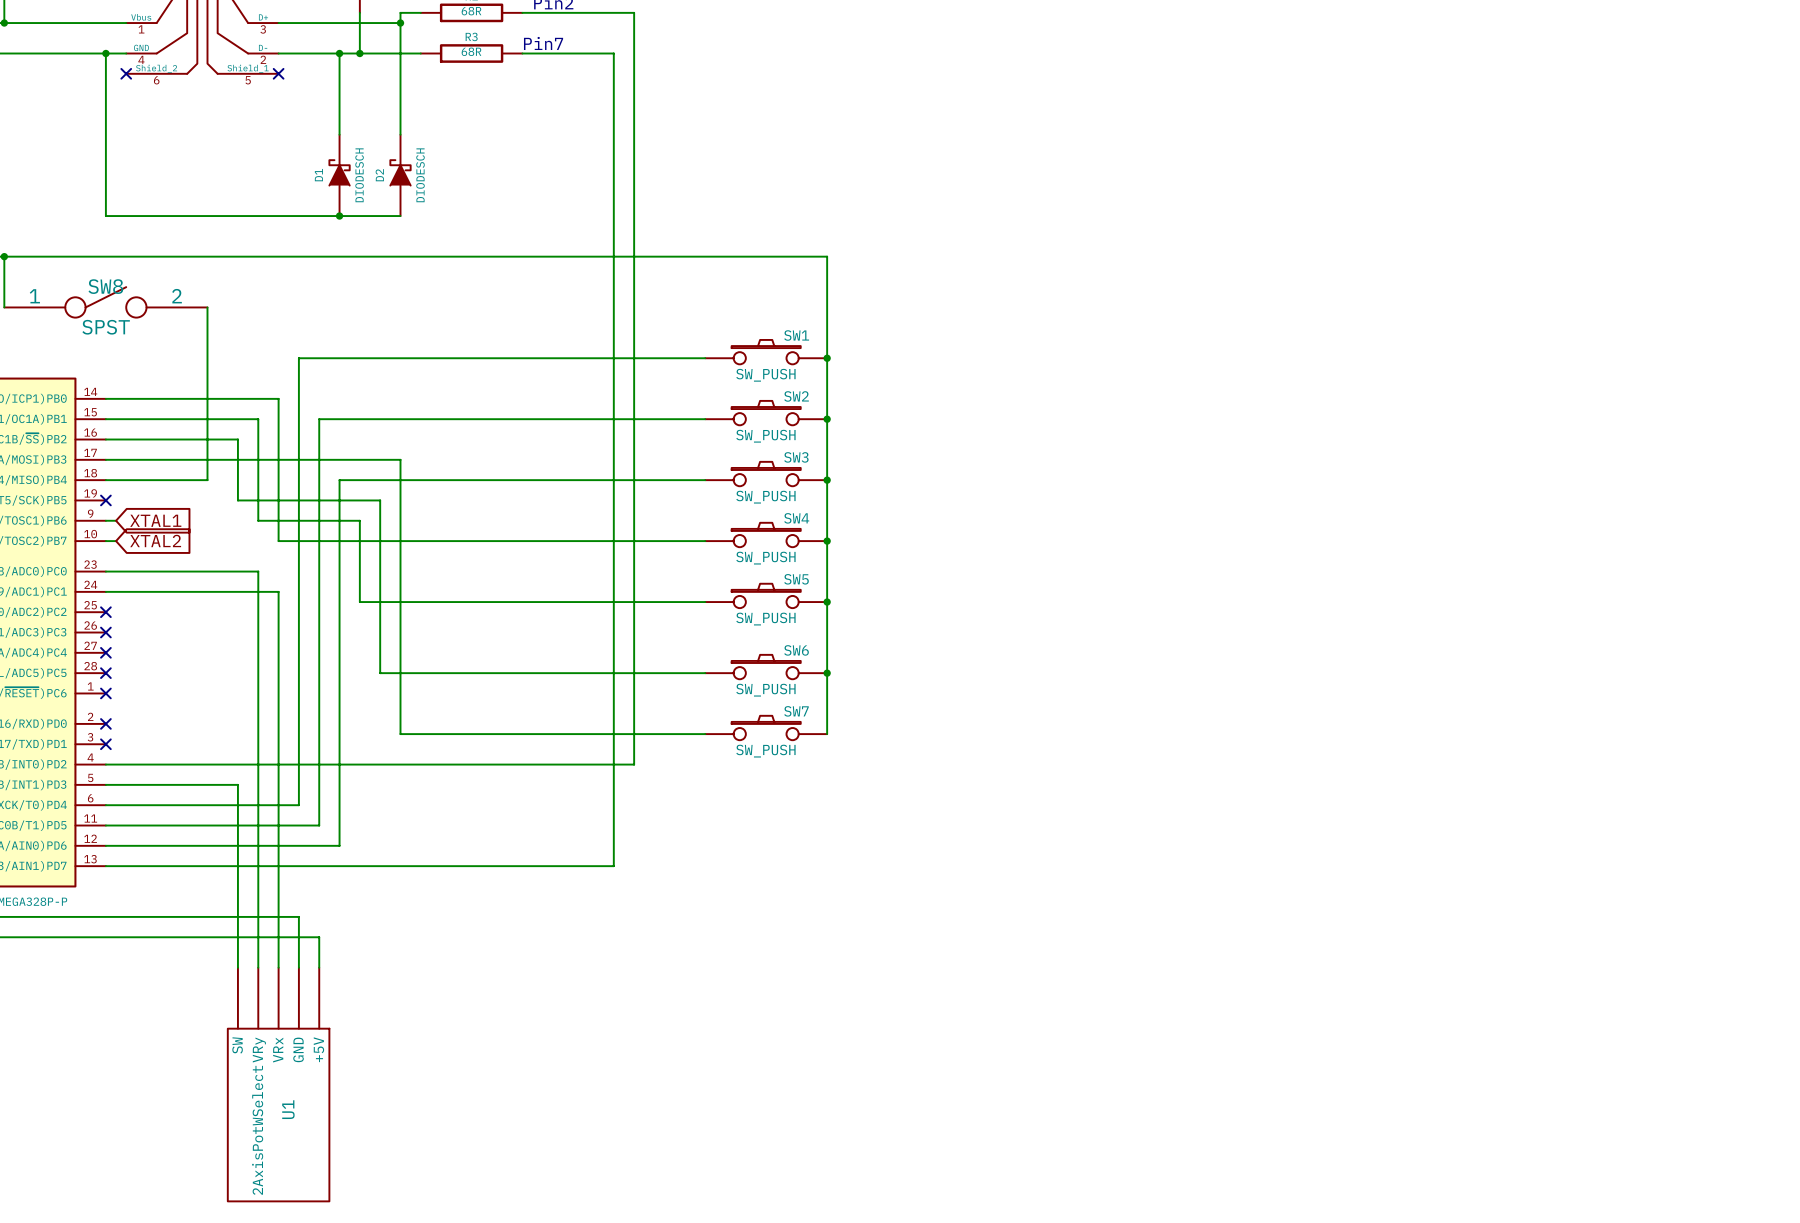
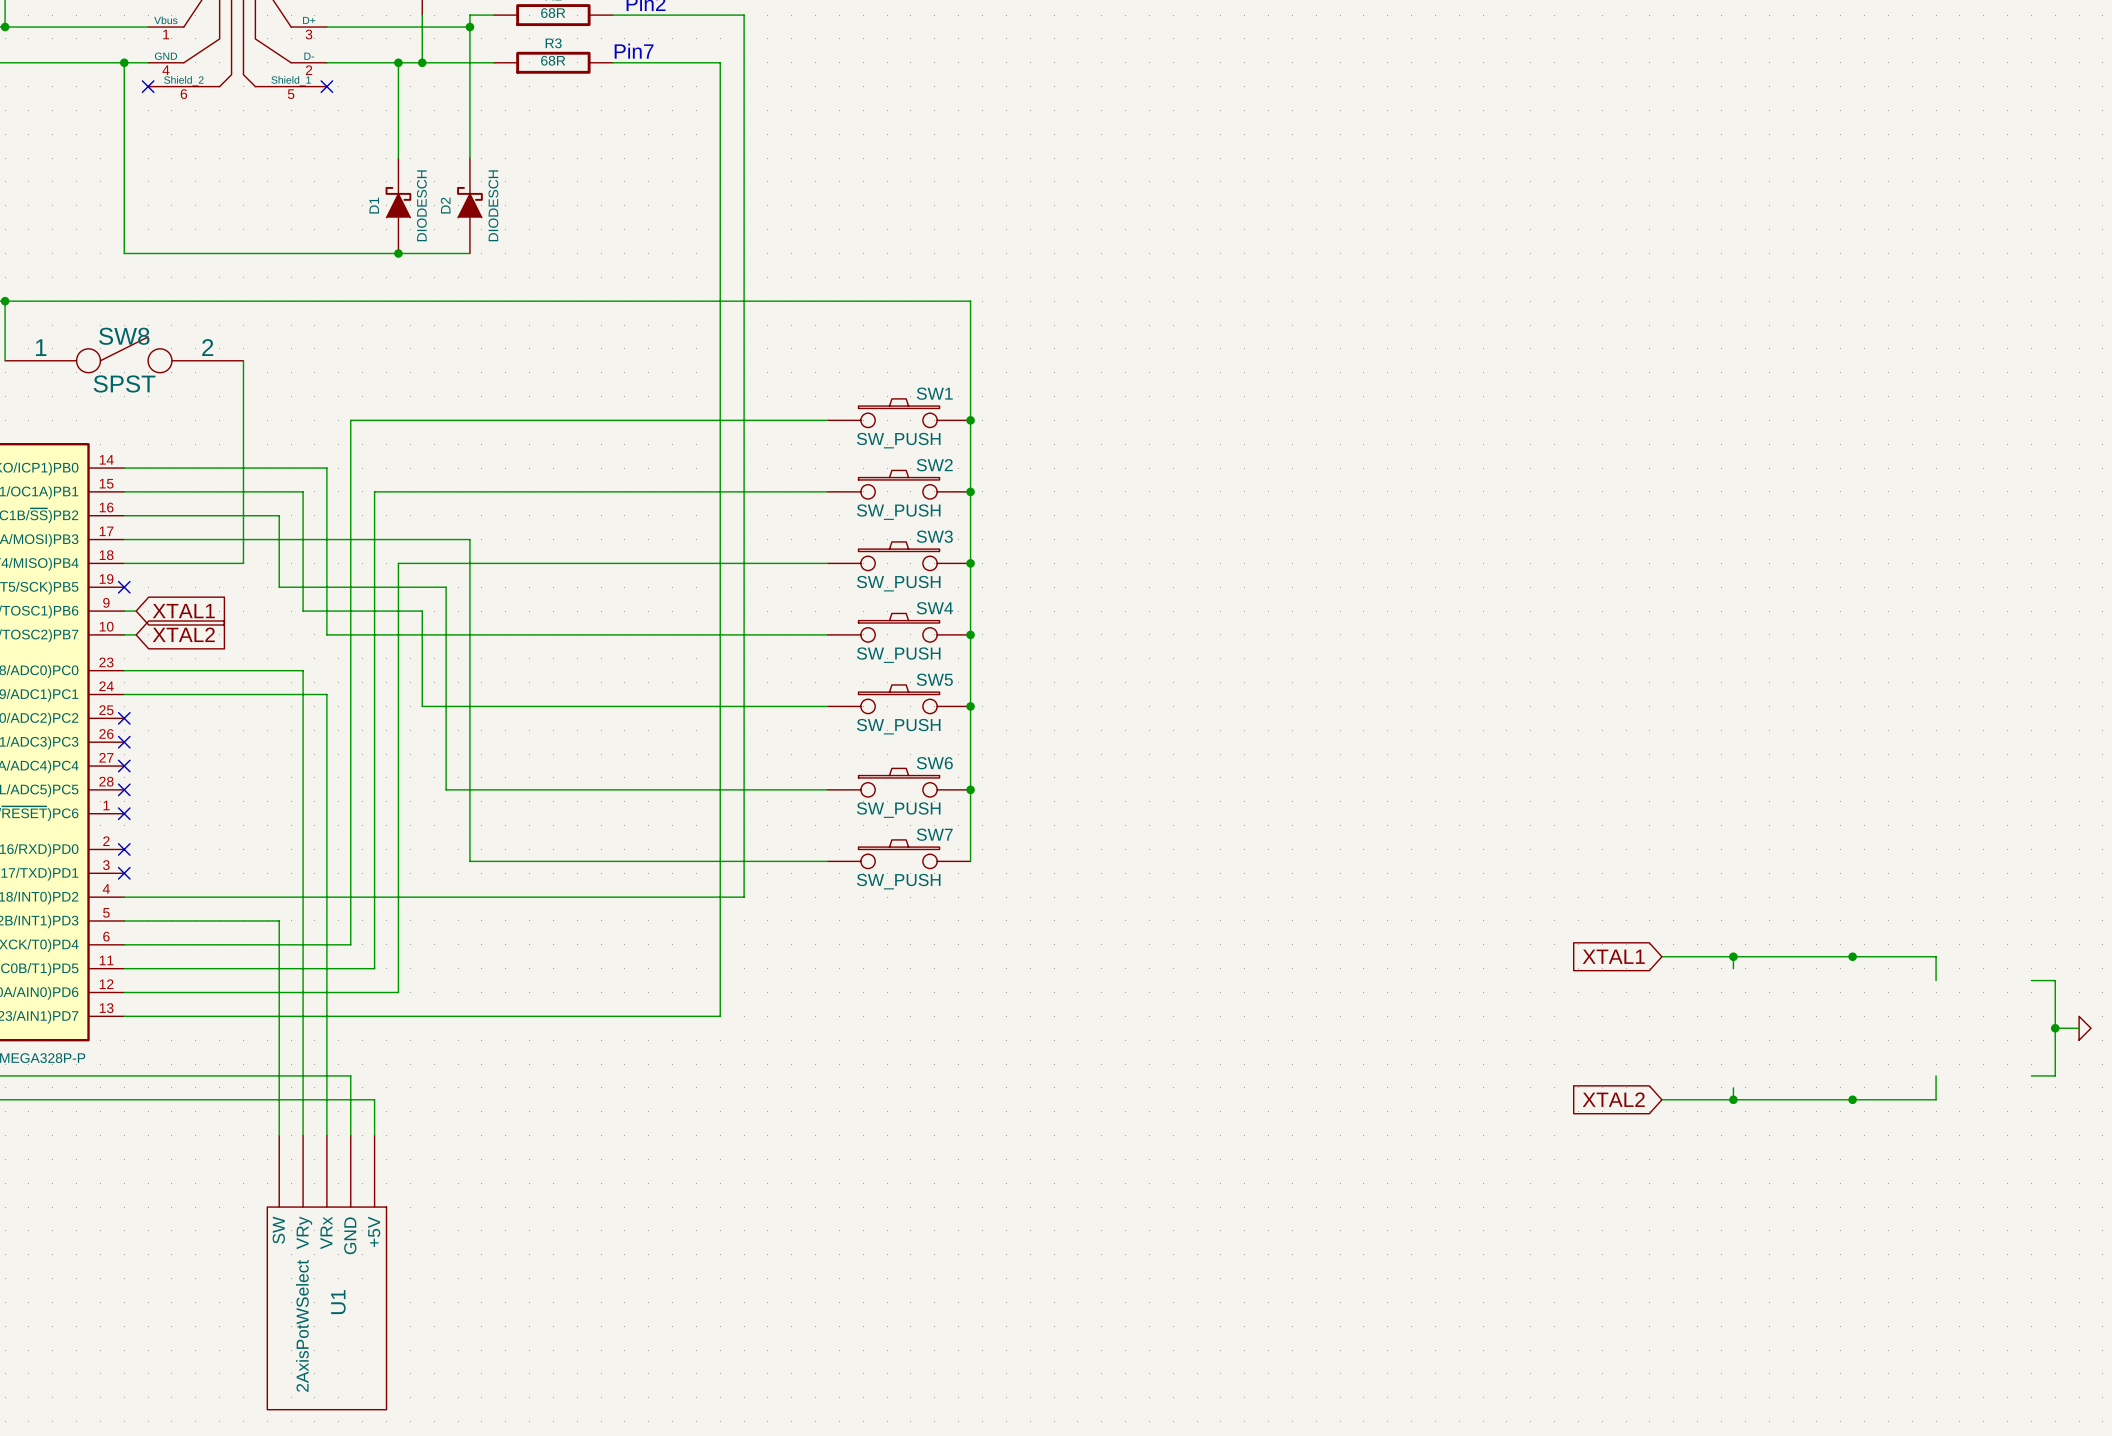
global label: none -> XTAL1 (1613, 956)
wire: none -> (1661, 956) (1936, 956) (1936, 980)
wire: none -> (1733, 956) (1733, 968)
junction: none -> (1733, 956)
junction: none -> (1852, 956)
wire: none -> (2031, 980) (2055, 980) (2055, 1075) (2031, 1075)
wire: none -> (2055, 1028) (2079, 1028)
junction: none -> (2055, 1028)
power symbol: none -> (2085, 1028)
wire: none -> (1936, 1075) (1936, 1099) (1661, 1099)
wire: none -> (1733, 1087) (1733, 1099)
global label: none -> XTAL2 (1613, 1099)
junction: none -> (1733, 1099)
junction: none -> (1852, 1099)

